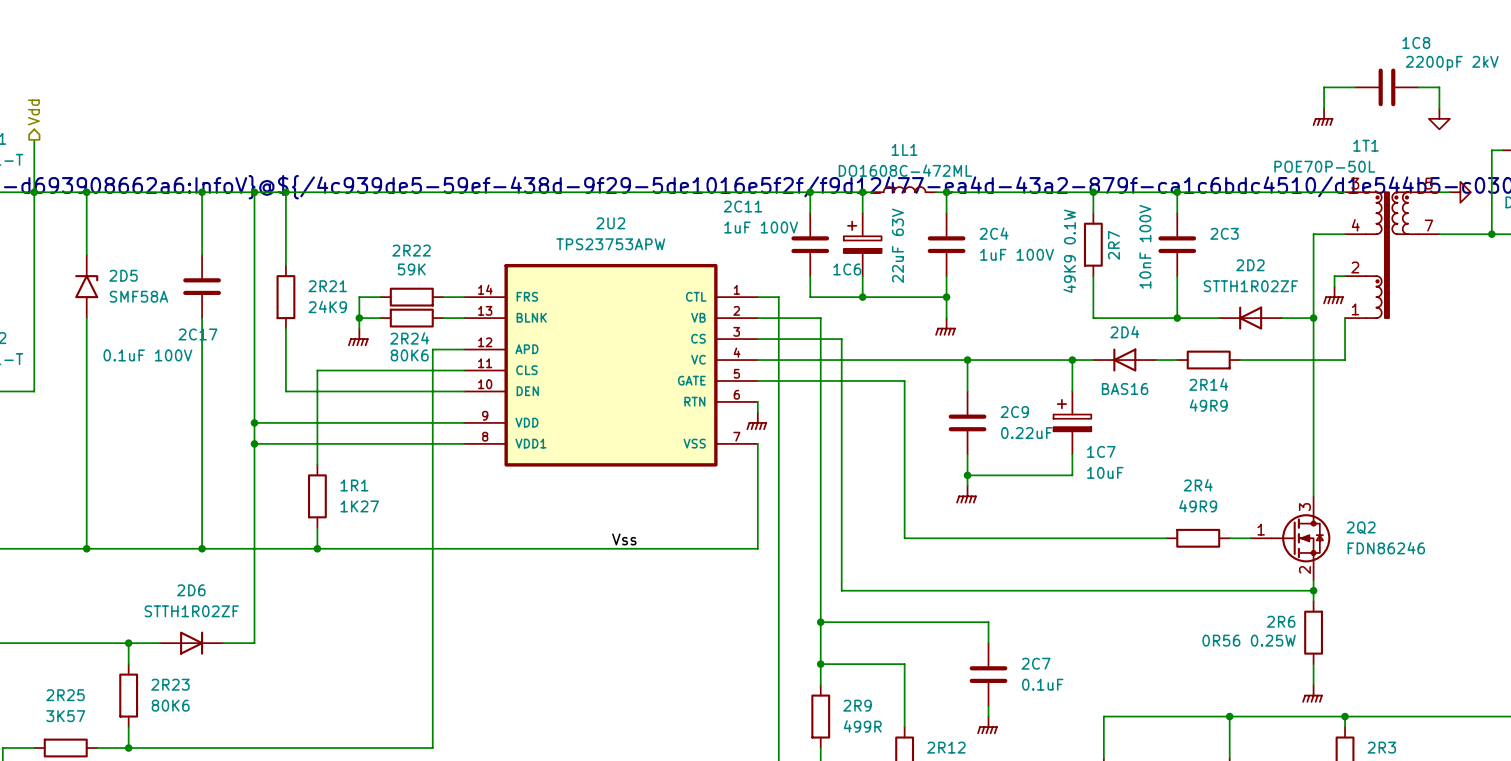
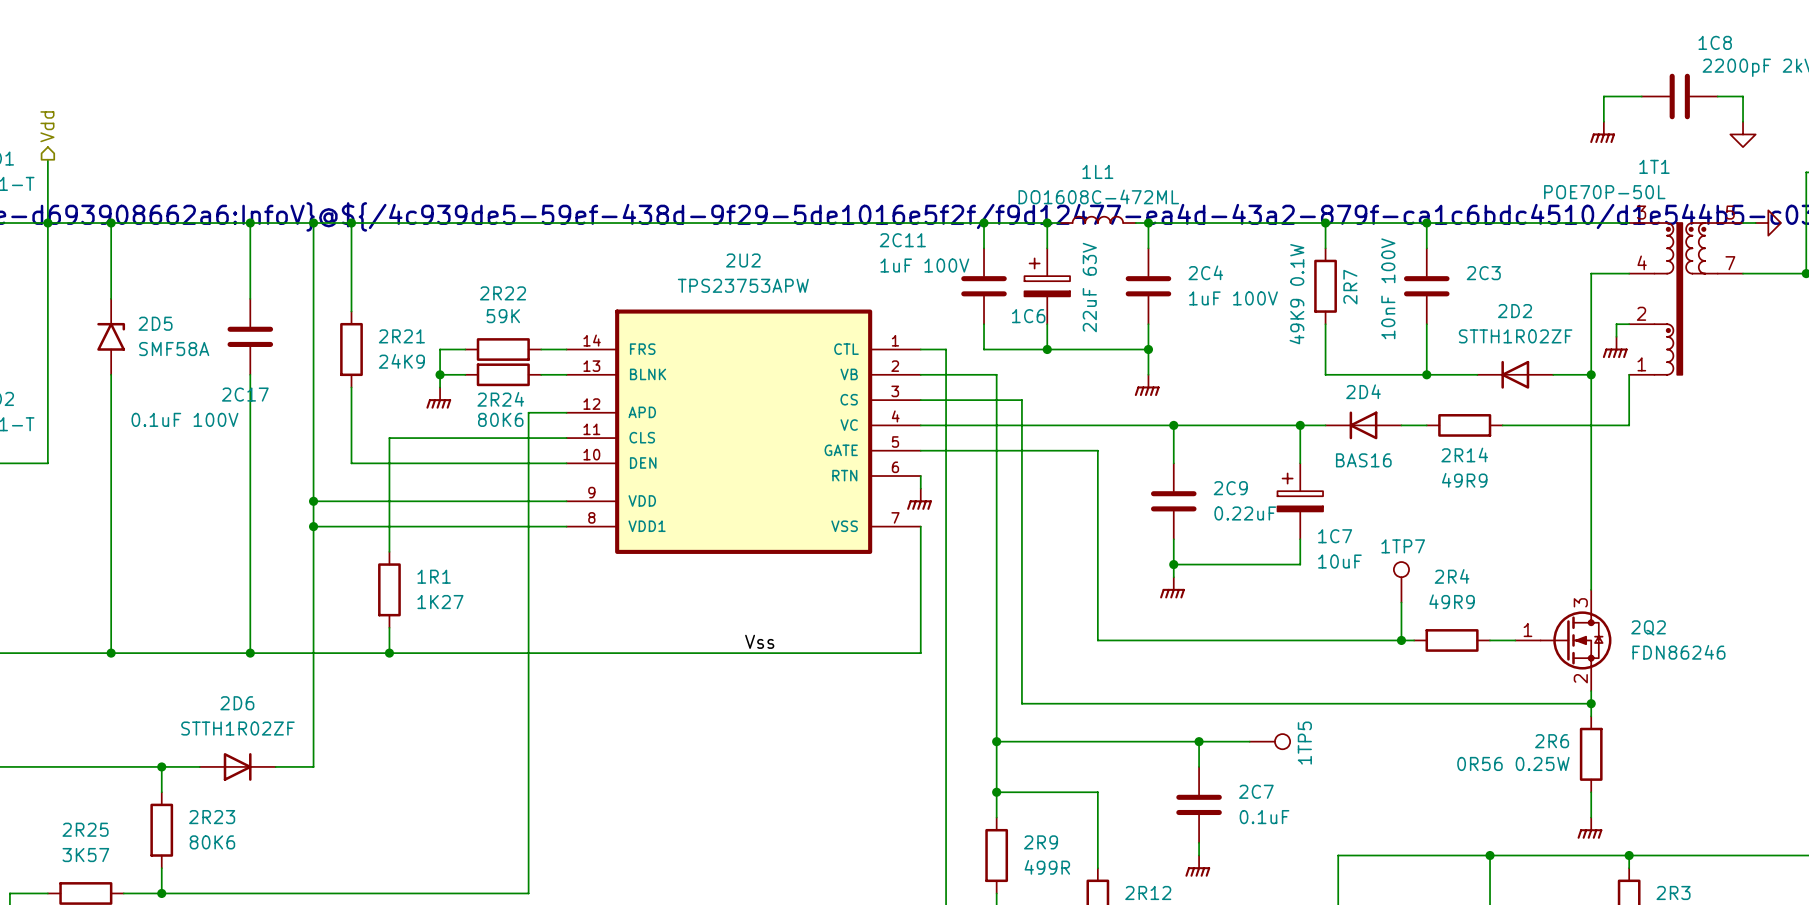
1TP7: none -> (1401, 582)
wire: none -> (1401, 602) (1401, 640)
junction: none -> (1401, 640)
wire: none -> (1199, 741) (1249, 741)
junction: none -> (1199, 741)
1TP5: none -> (1269, 741)

